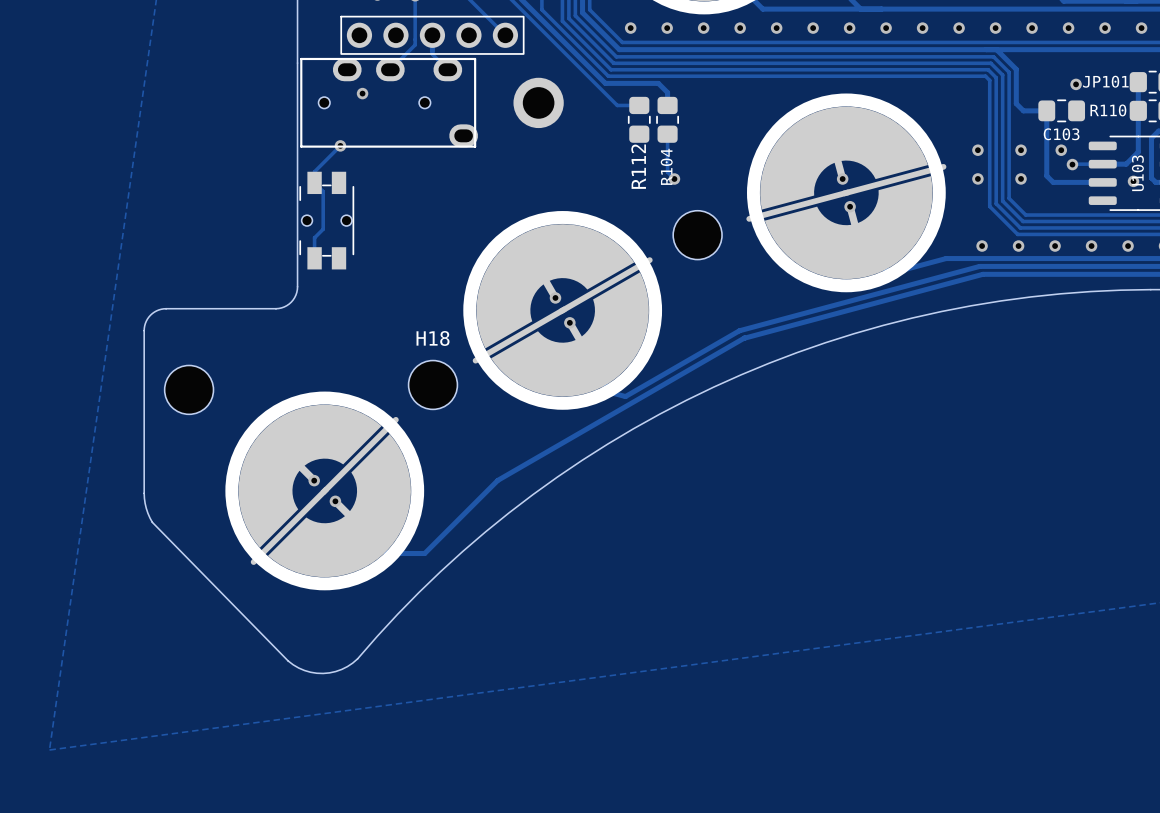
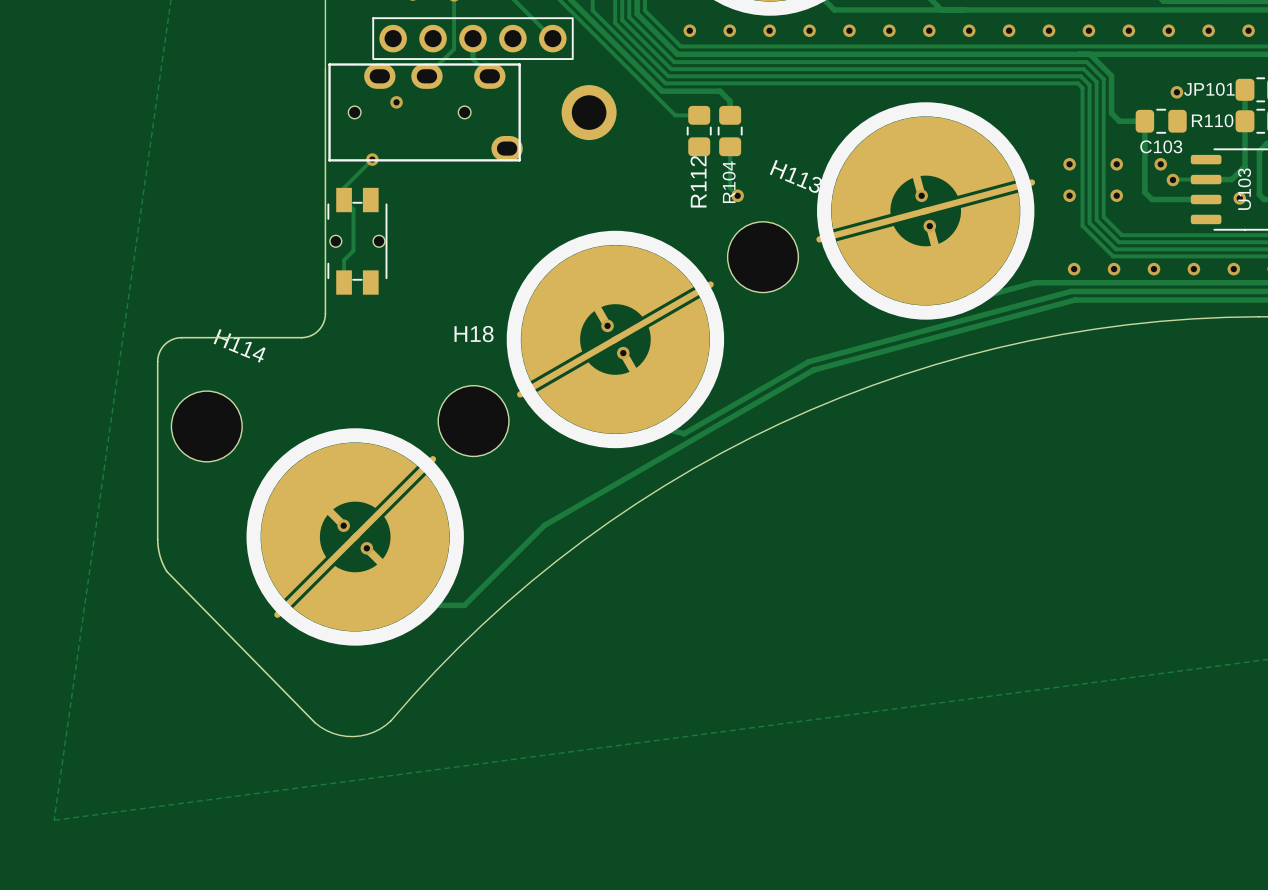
part: (697, 235) -> none
H113: none -> (762, 257)
H18 name position: H18 (433, 338) -> H18 (474, 334)
H18 footprint: [408, 360, 458, 410] -> [438, 385, 509, 457]
part: (189, 389) -> none
H114: none -> (206, 426)

